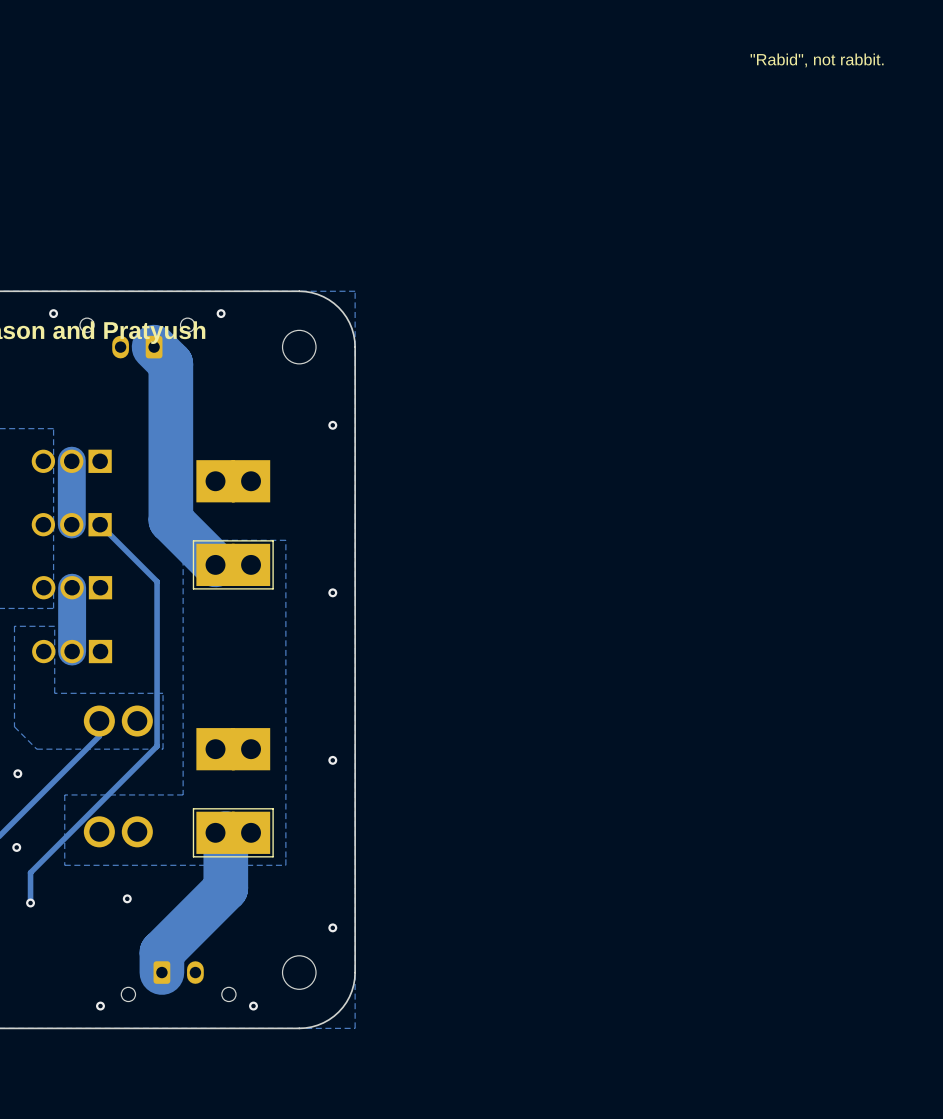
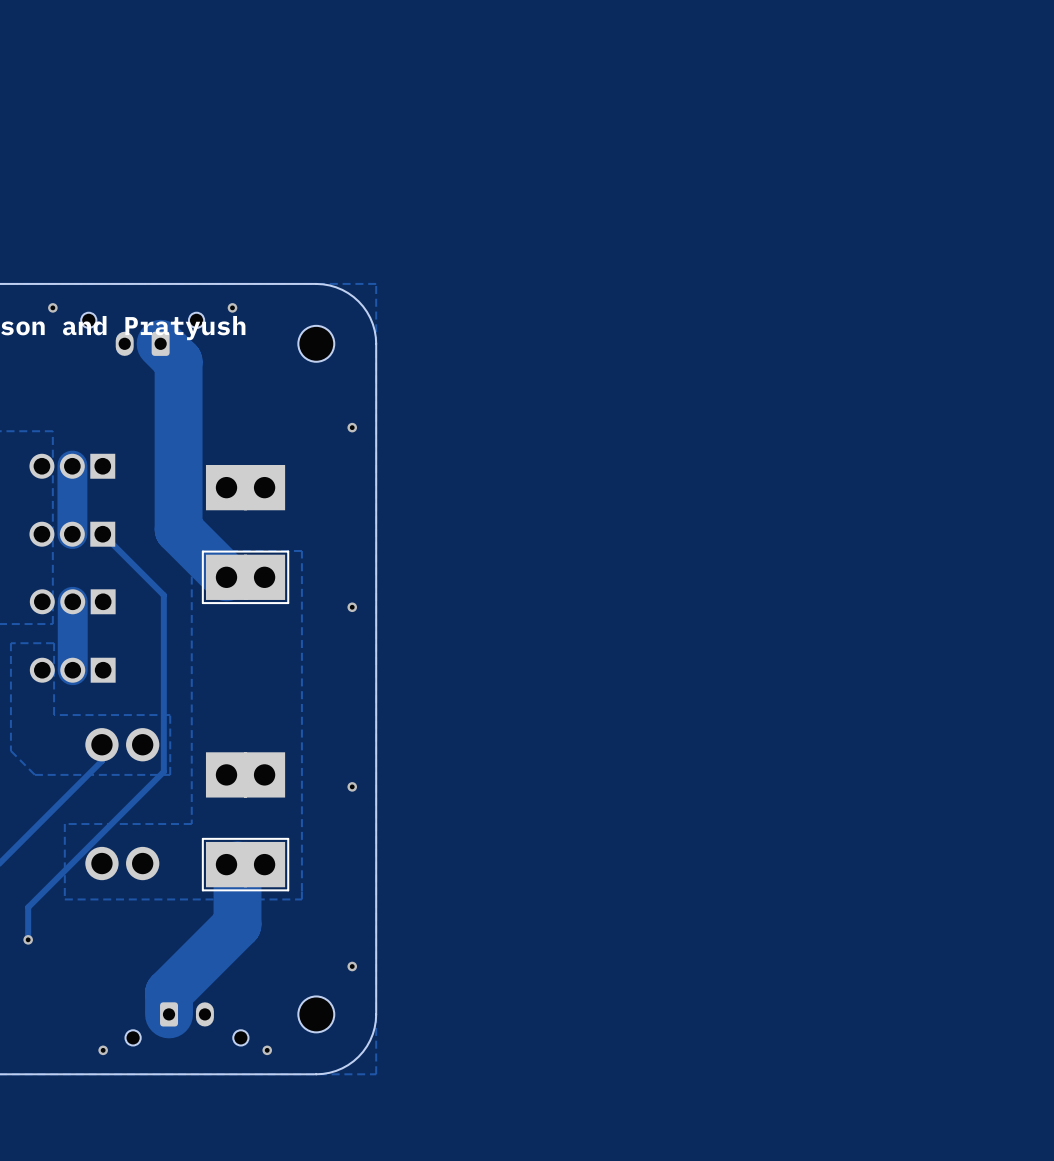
text: "Rabid", not rabbit. (817, 60) -> none
via: (17, 773) -> none
via: (16, 847) -> none
via: (127, 898) -> none

